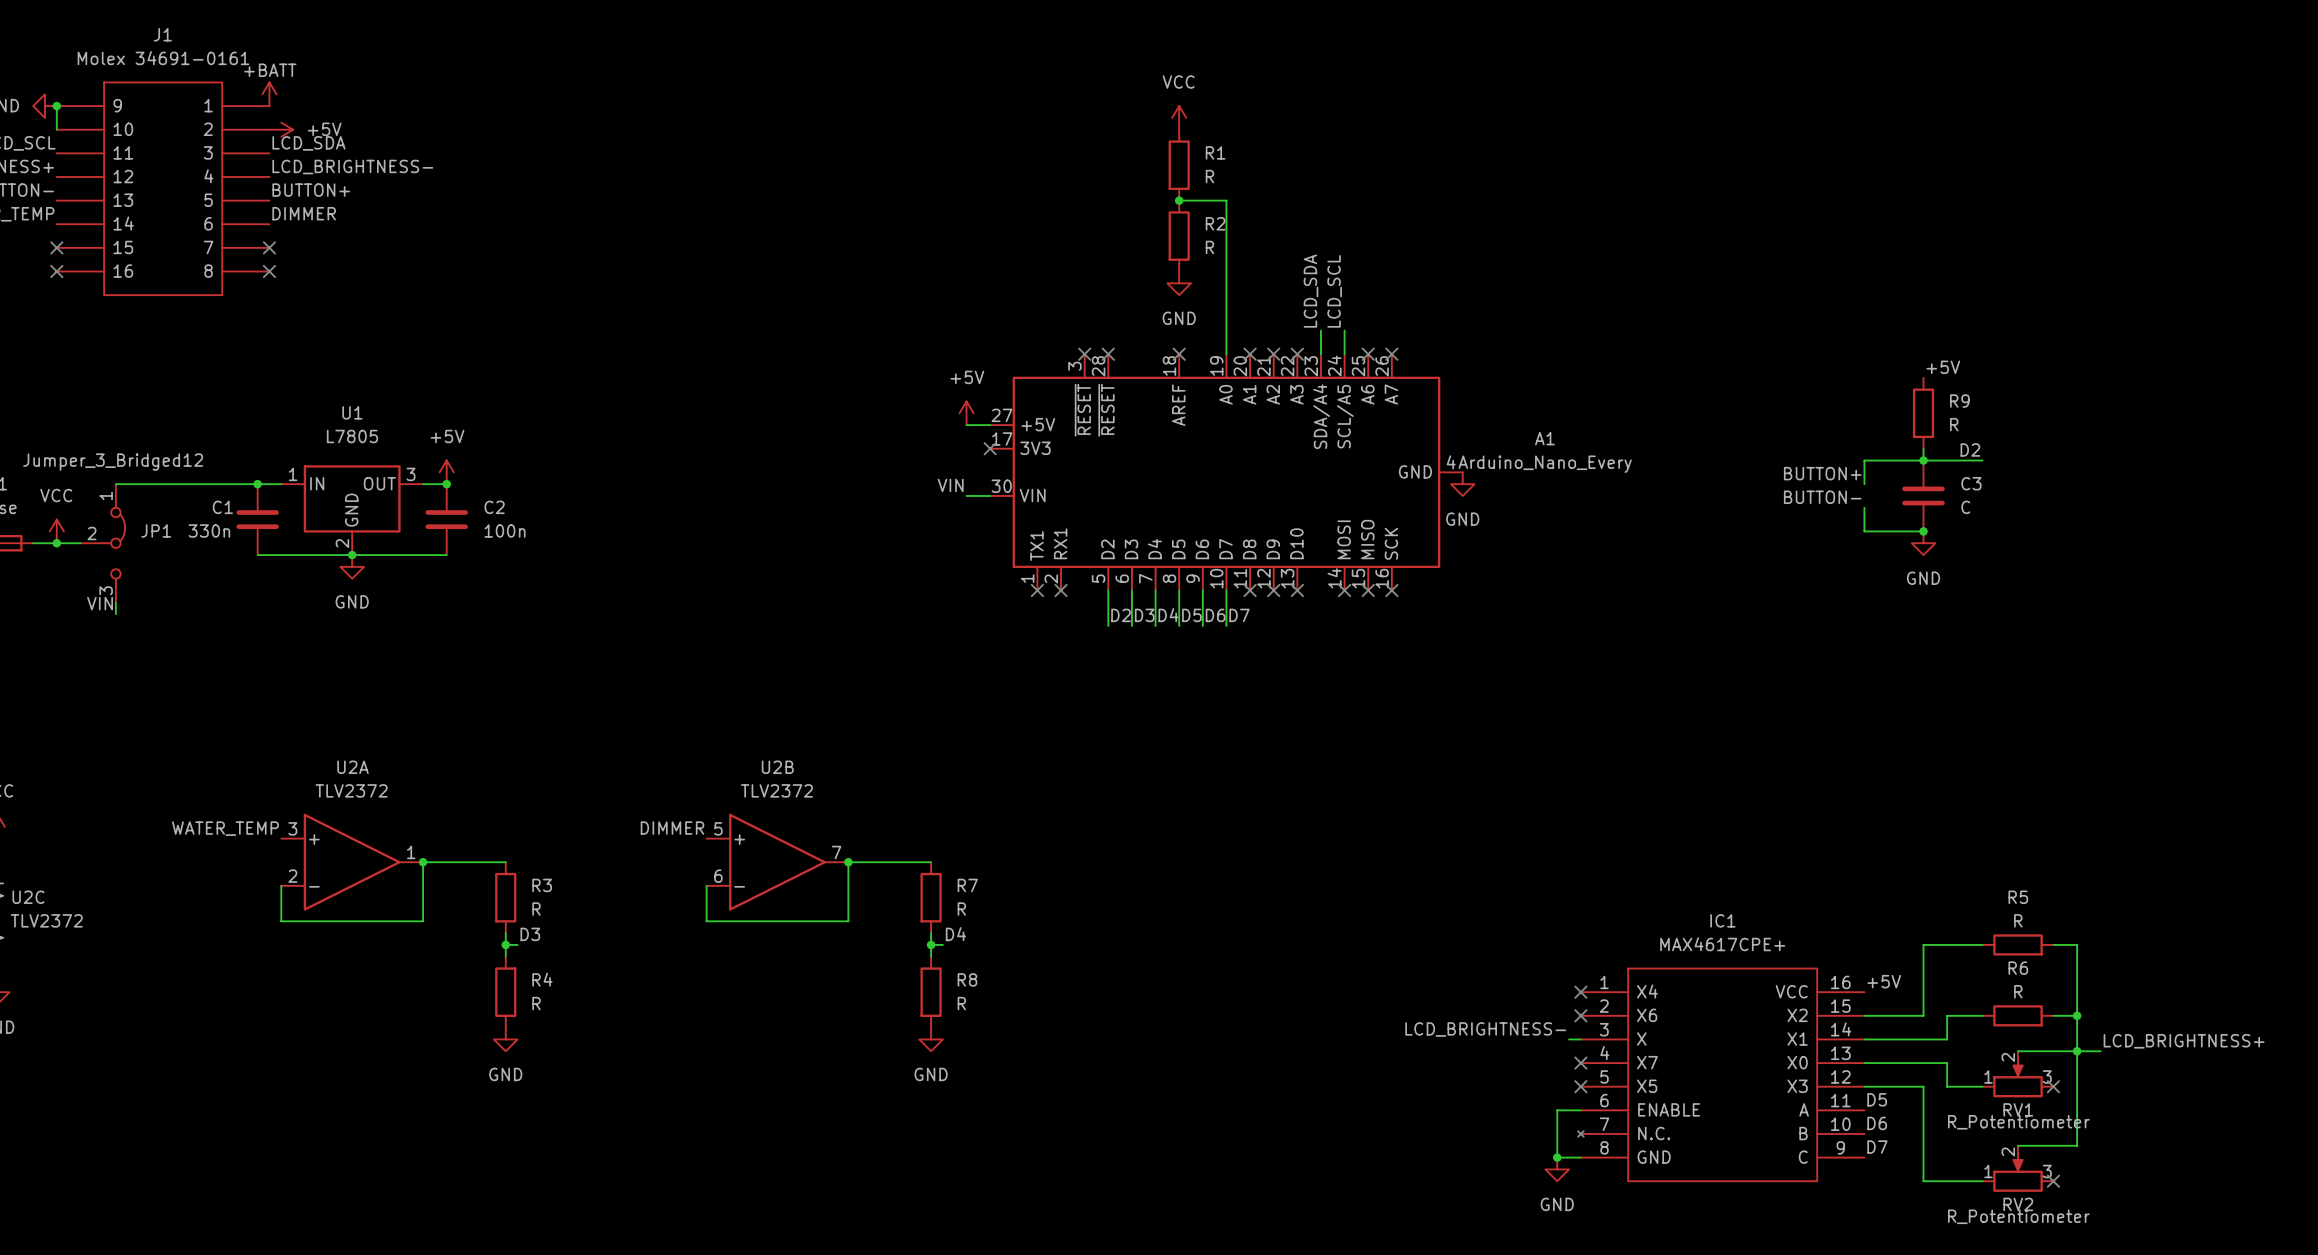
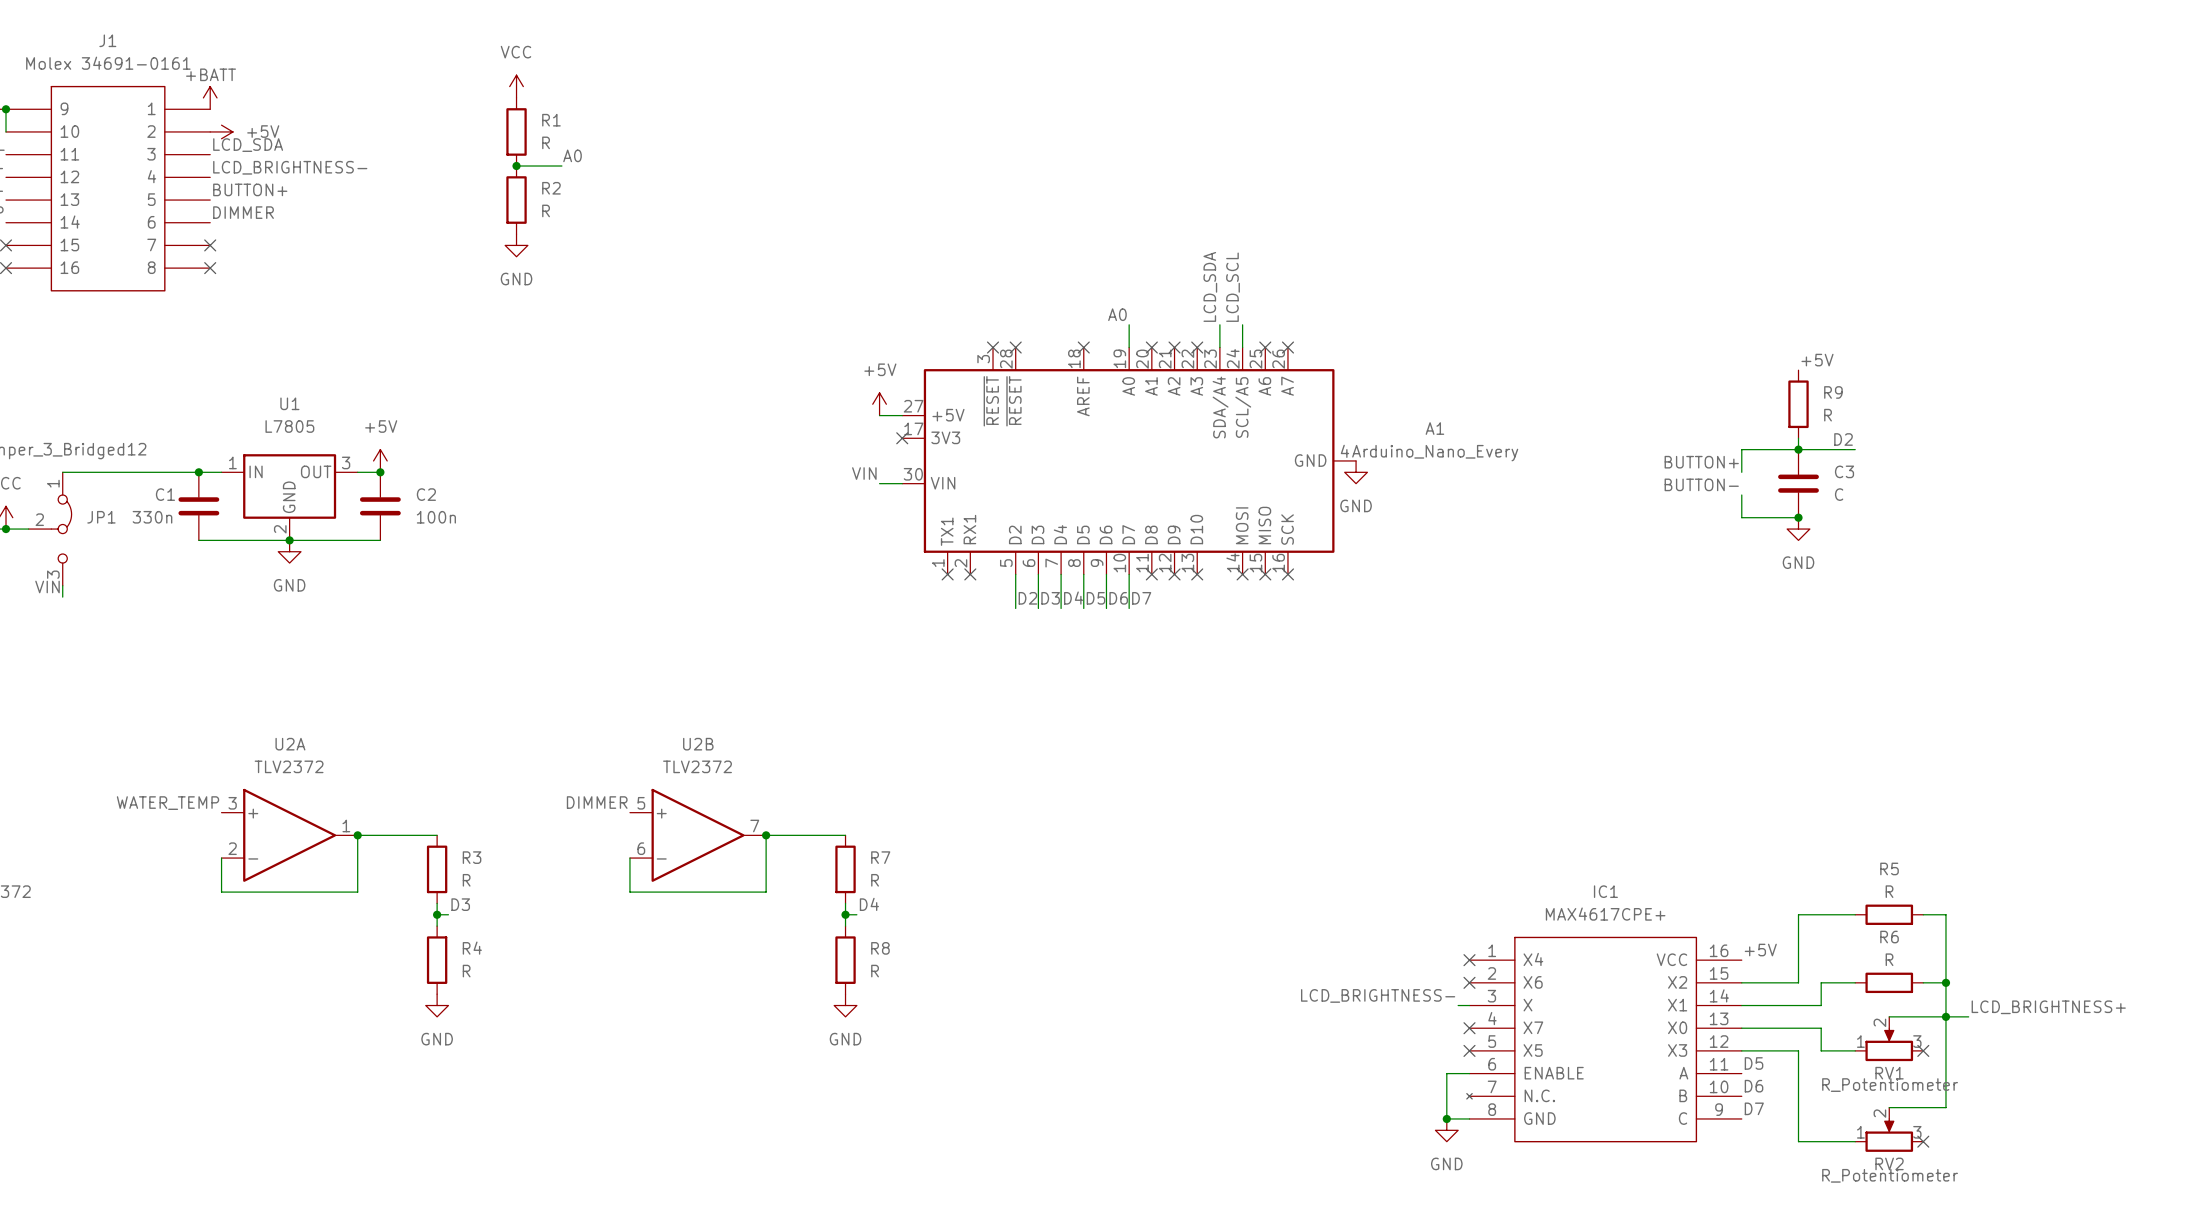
power symbol: none -> VCC (516, 86)
power symbol: VCC (1179, 117) -> none
label: none -> A0 (572, 155)
wire: none -> (516, 166) (561, 166)
junction: none -> (516, 166)
R1 position: (1179, 165) -> (516, 131)
wire: (1179, 200) (1226, 200) (1226, 330) -> none
junction: (1179, 200) -> none
R2 position: (1179, 236) -> (516, 200)
power symbol: none -> GND (516, 245)
power symbol: GND (1179, 283) -> none
label: none -> A0 (1117, 314)

